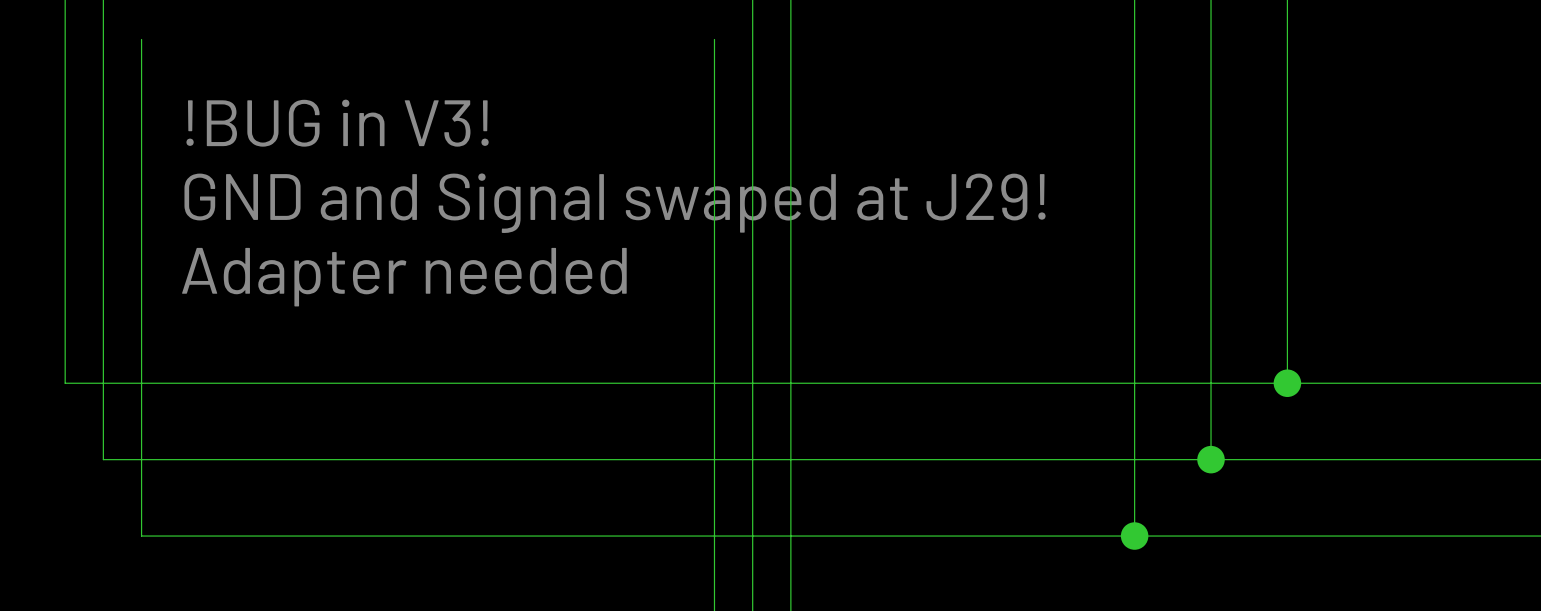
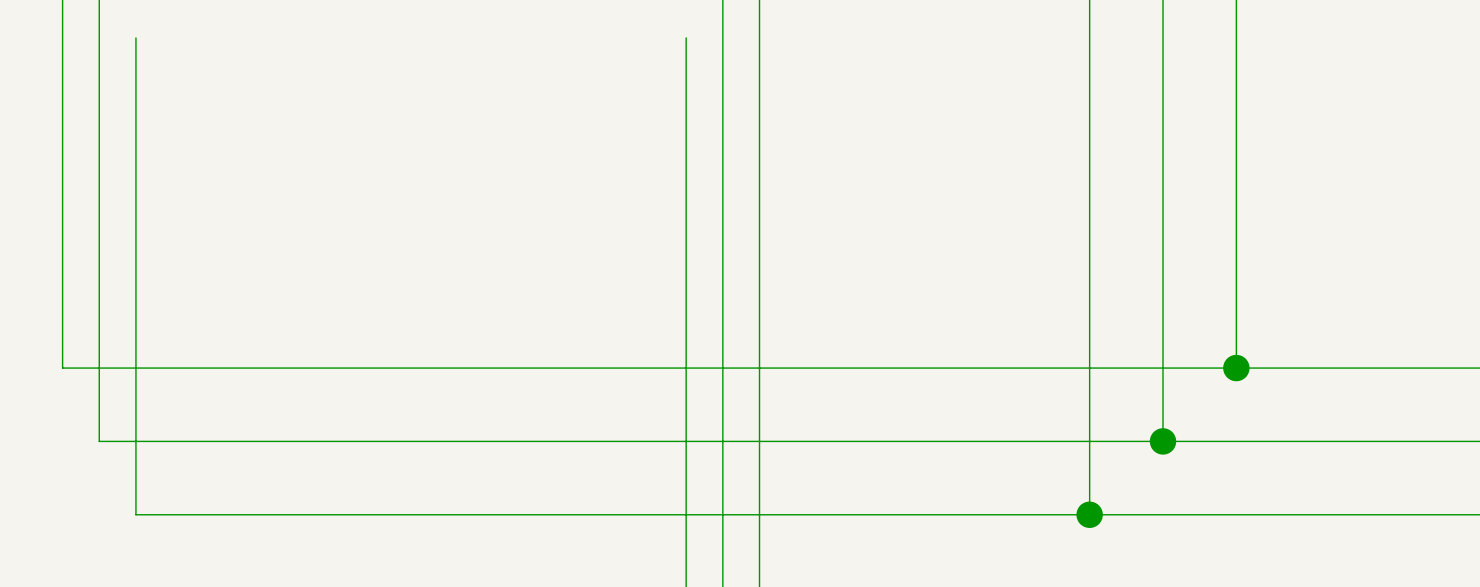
text: !BUG in V3! (337, 123) -> none
text: GND and Signal swaped at J29! (615, 203) -> none
text: Adapter needed (404, 277) -> none

